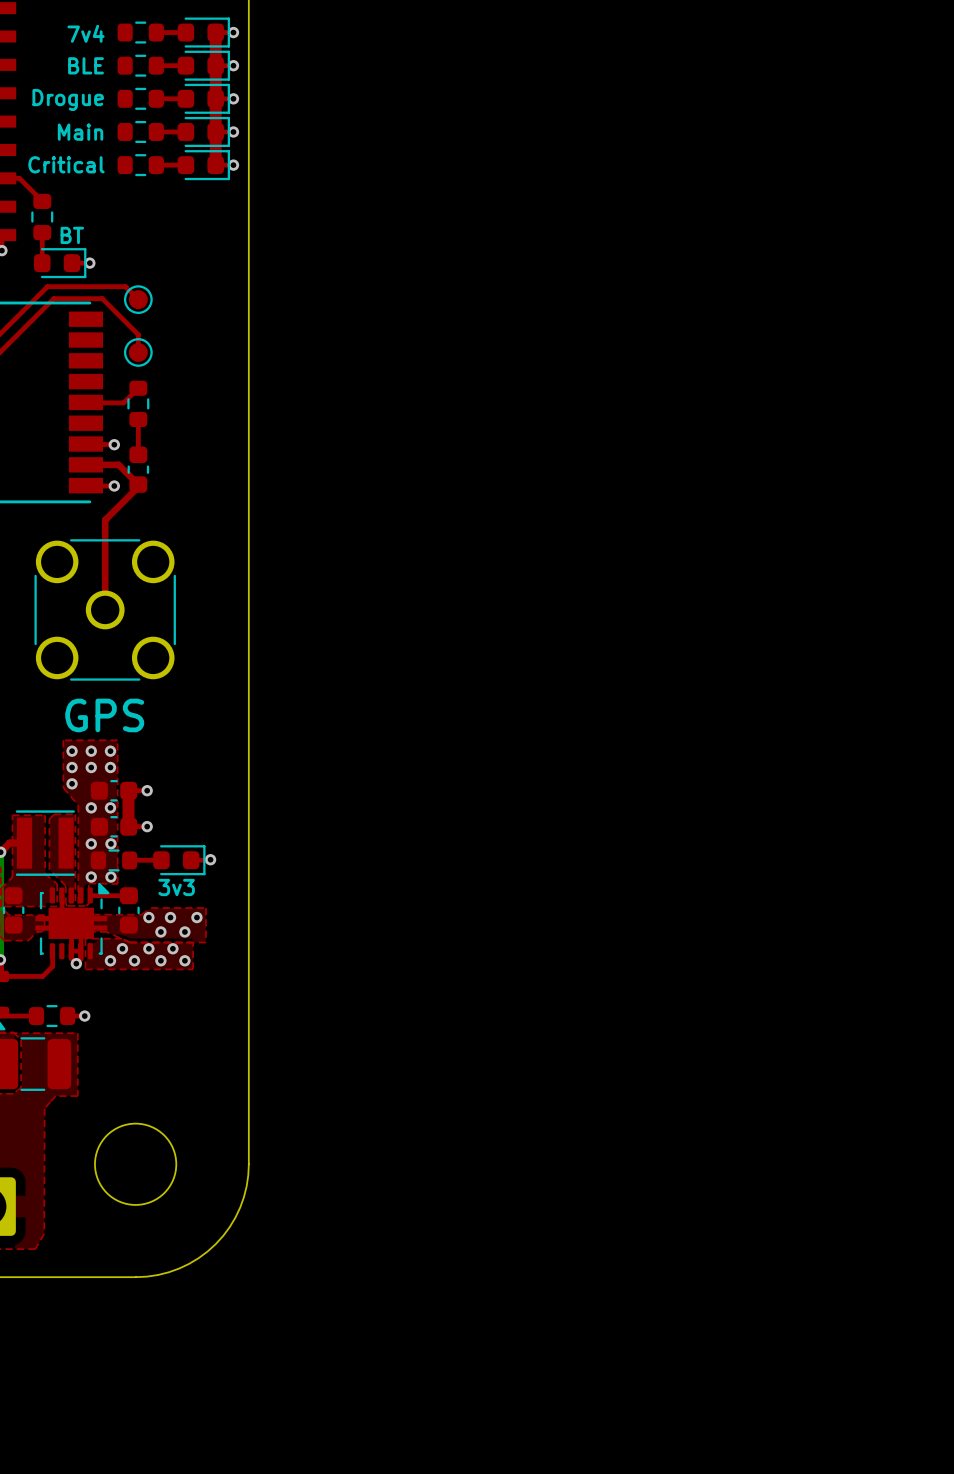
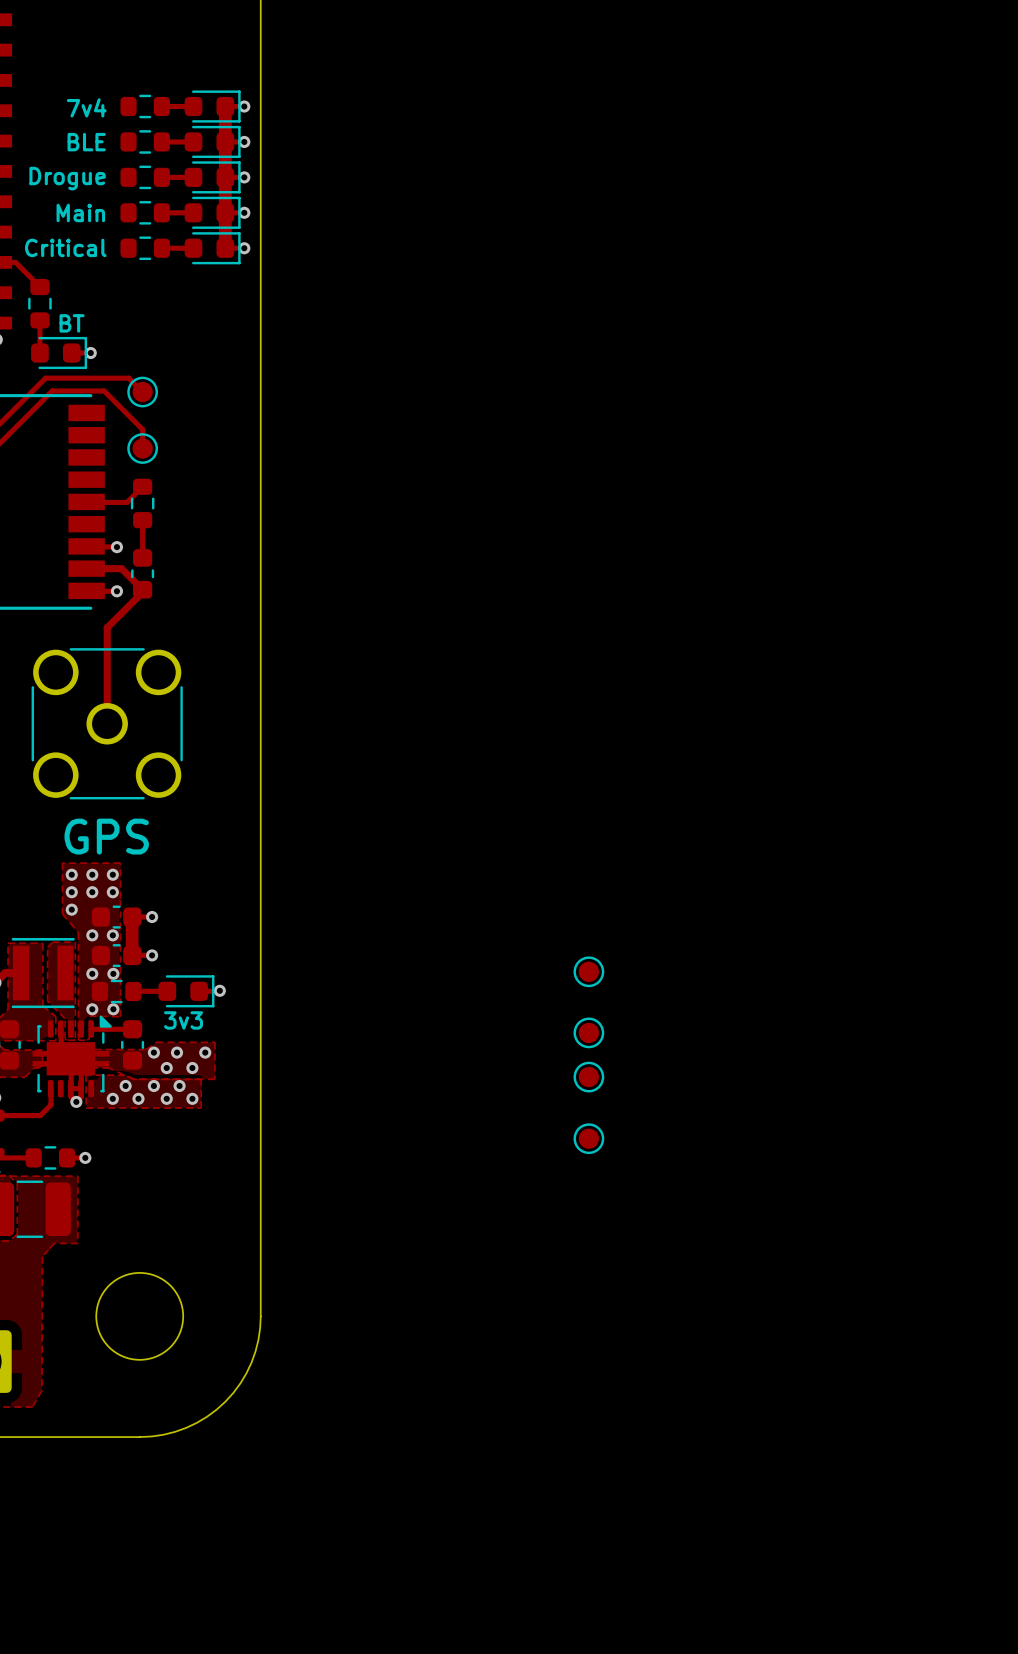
part: none -> (588, 971)
part: none -> (588, 1032)
part: none -> (588, 1077)
part: none -> (588, 1138)

